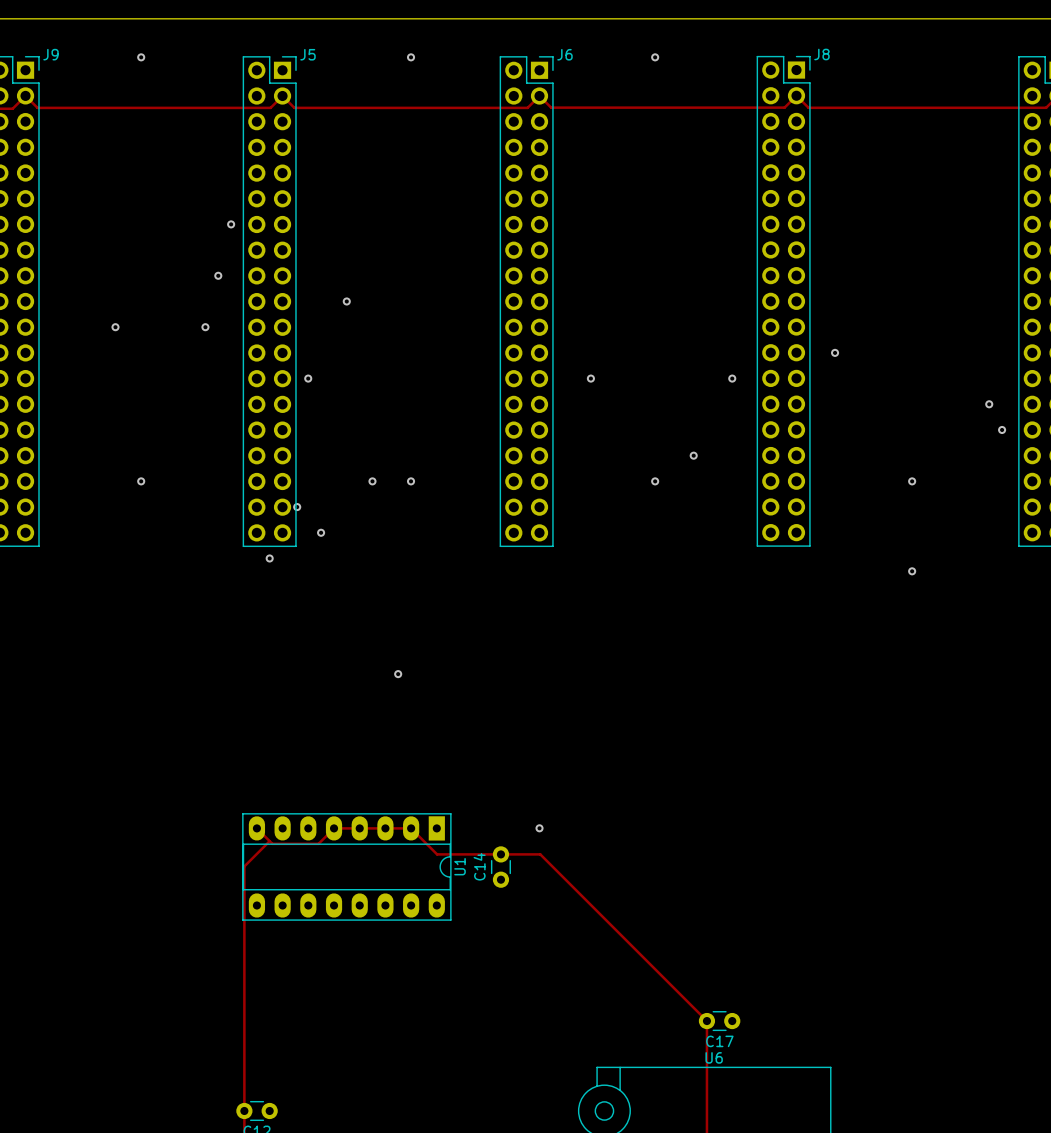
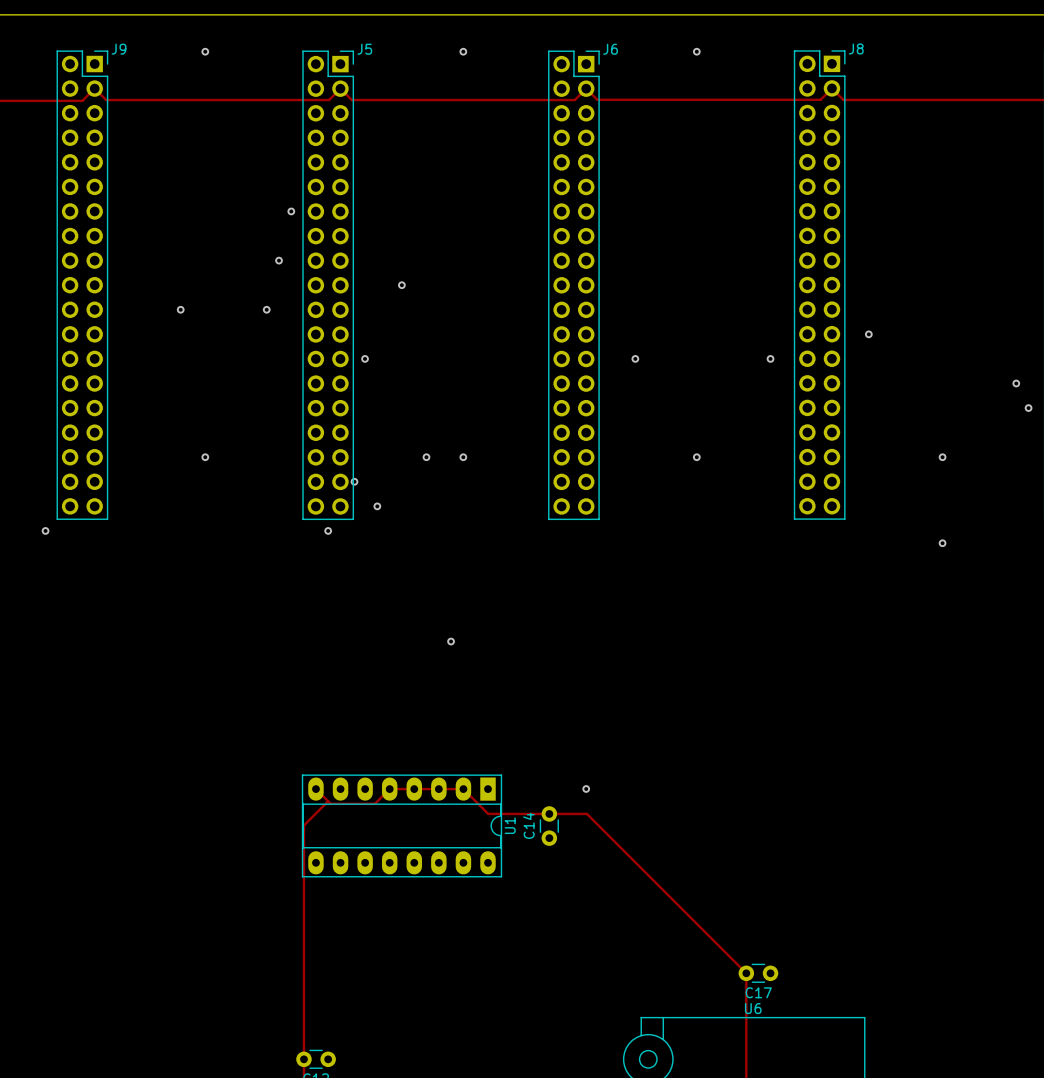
via: (693, 455) -> none

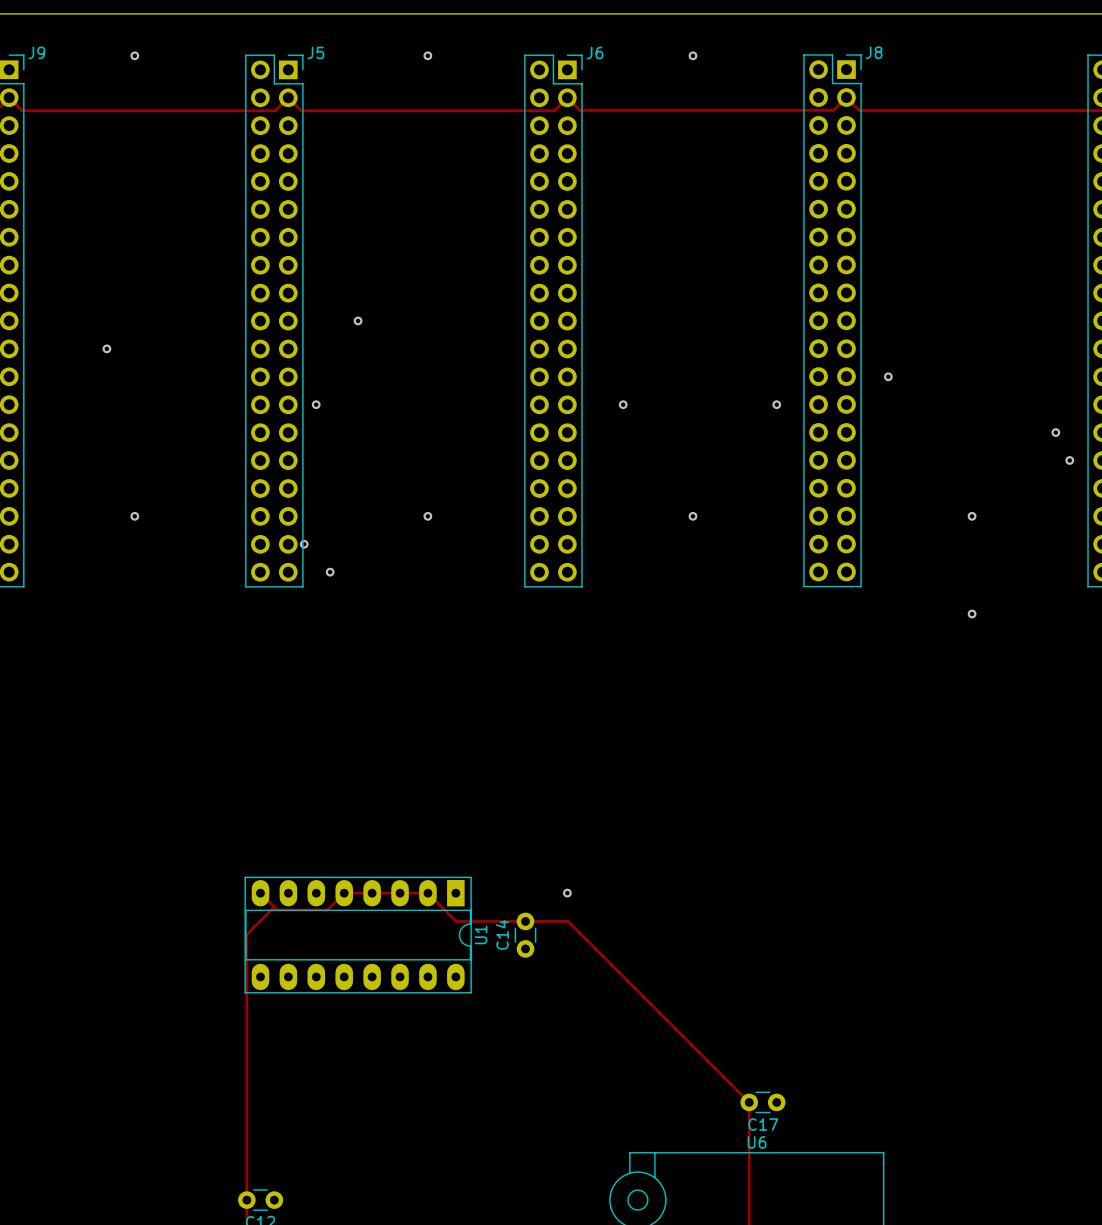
via: (291, 211) -> none
via: (279, 260) -> none
via: (266, 309) -> none
via: (426, 457) -> none
via: (328, 530) -> none
via: (451, 641) -> none

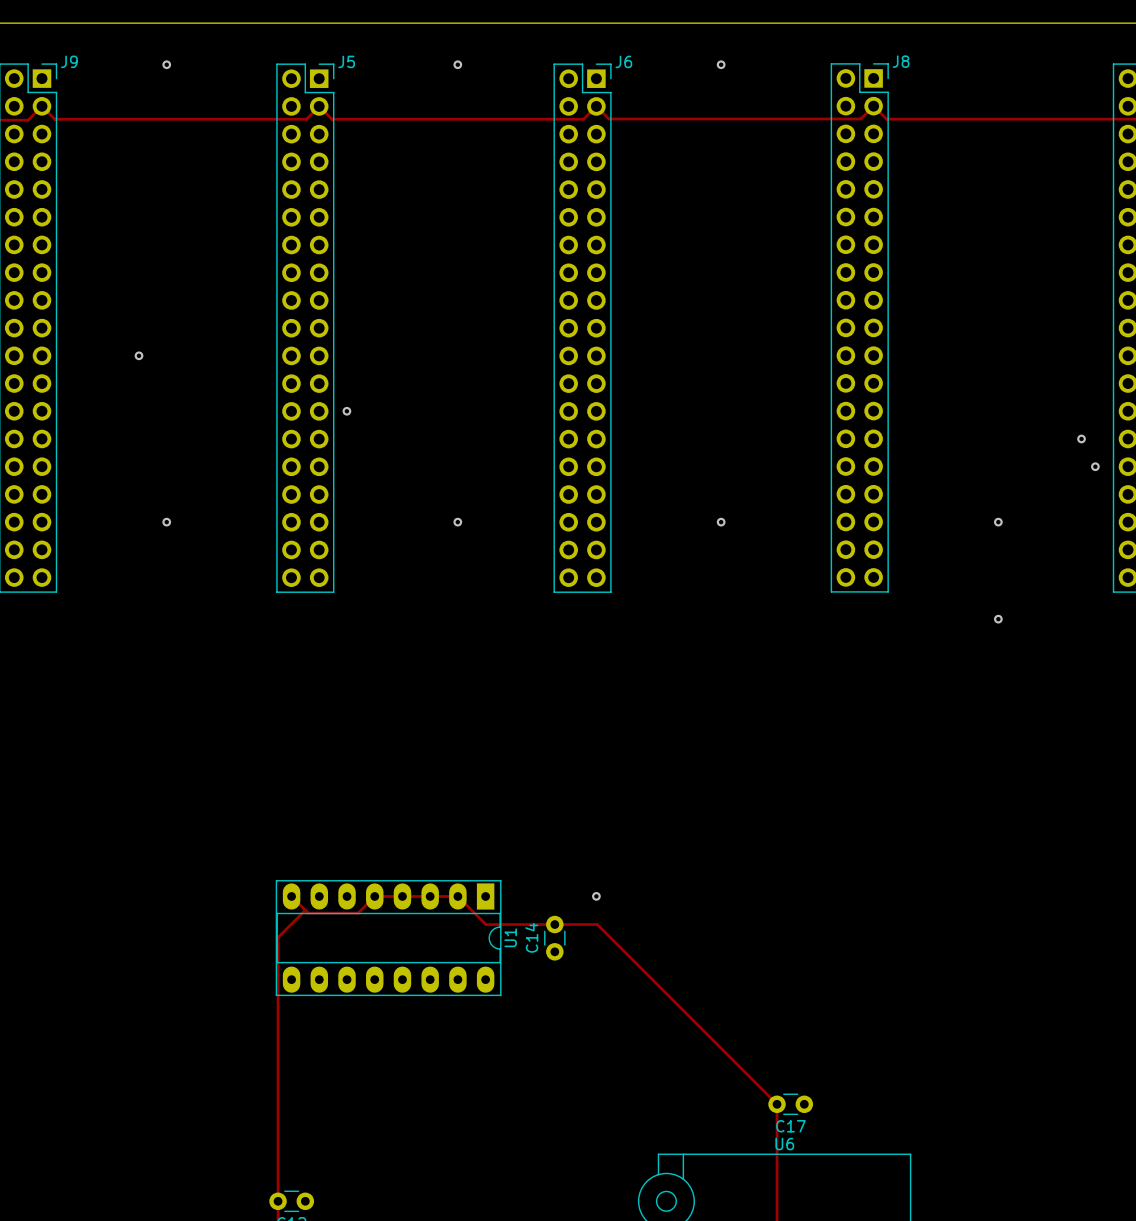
via: (358, 320) -> none
via: (888, 376) -> none
via: (623, 404) -> none
via: (776, 404) -> none
via: (304, 544) -> none
via: (330, 572) -> none

